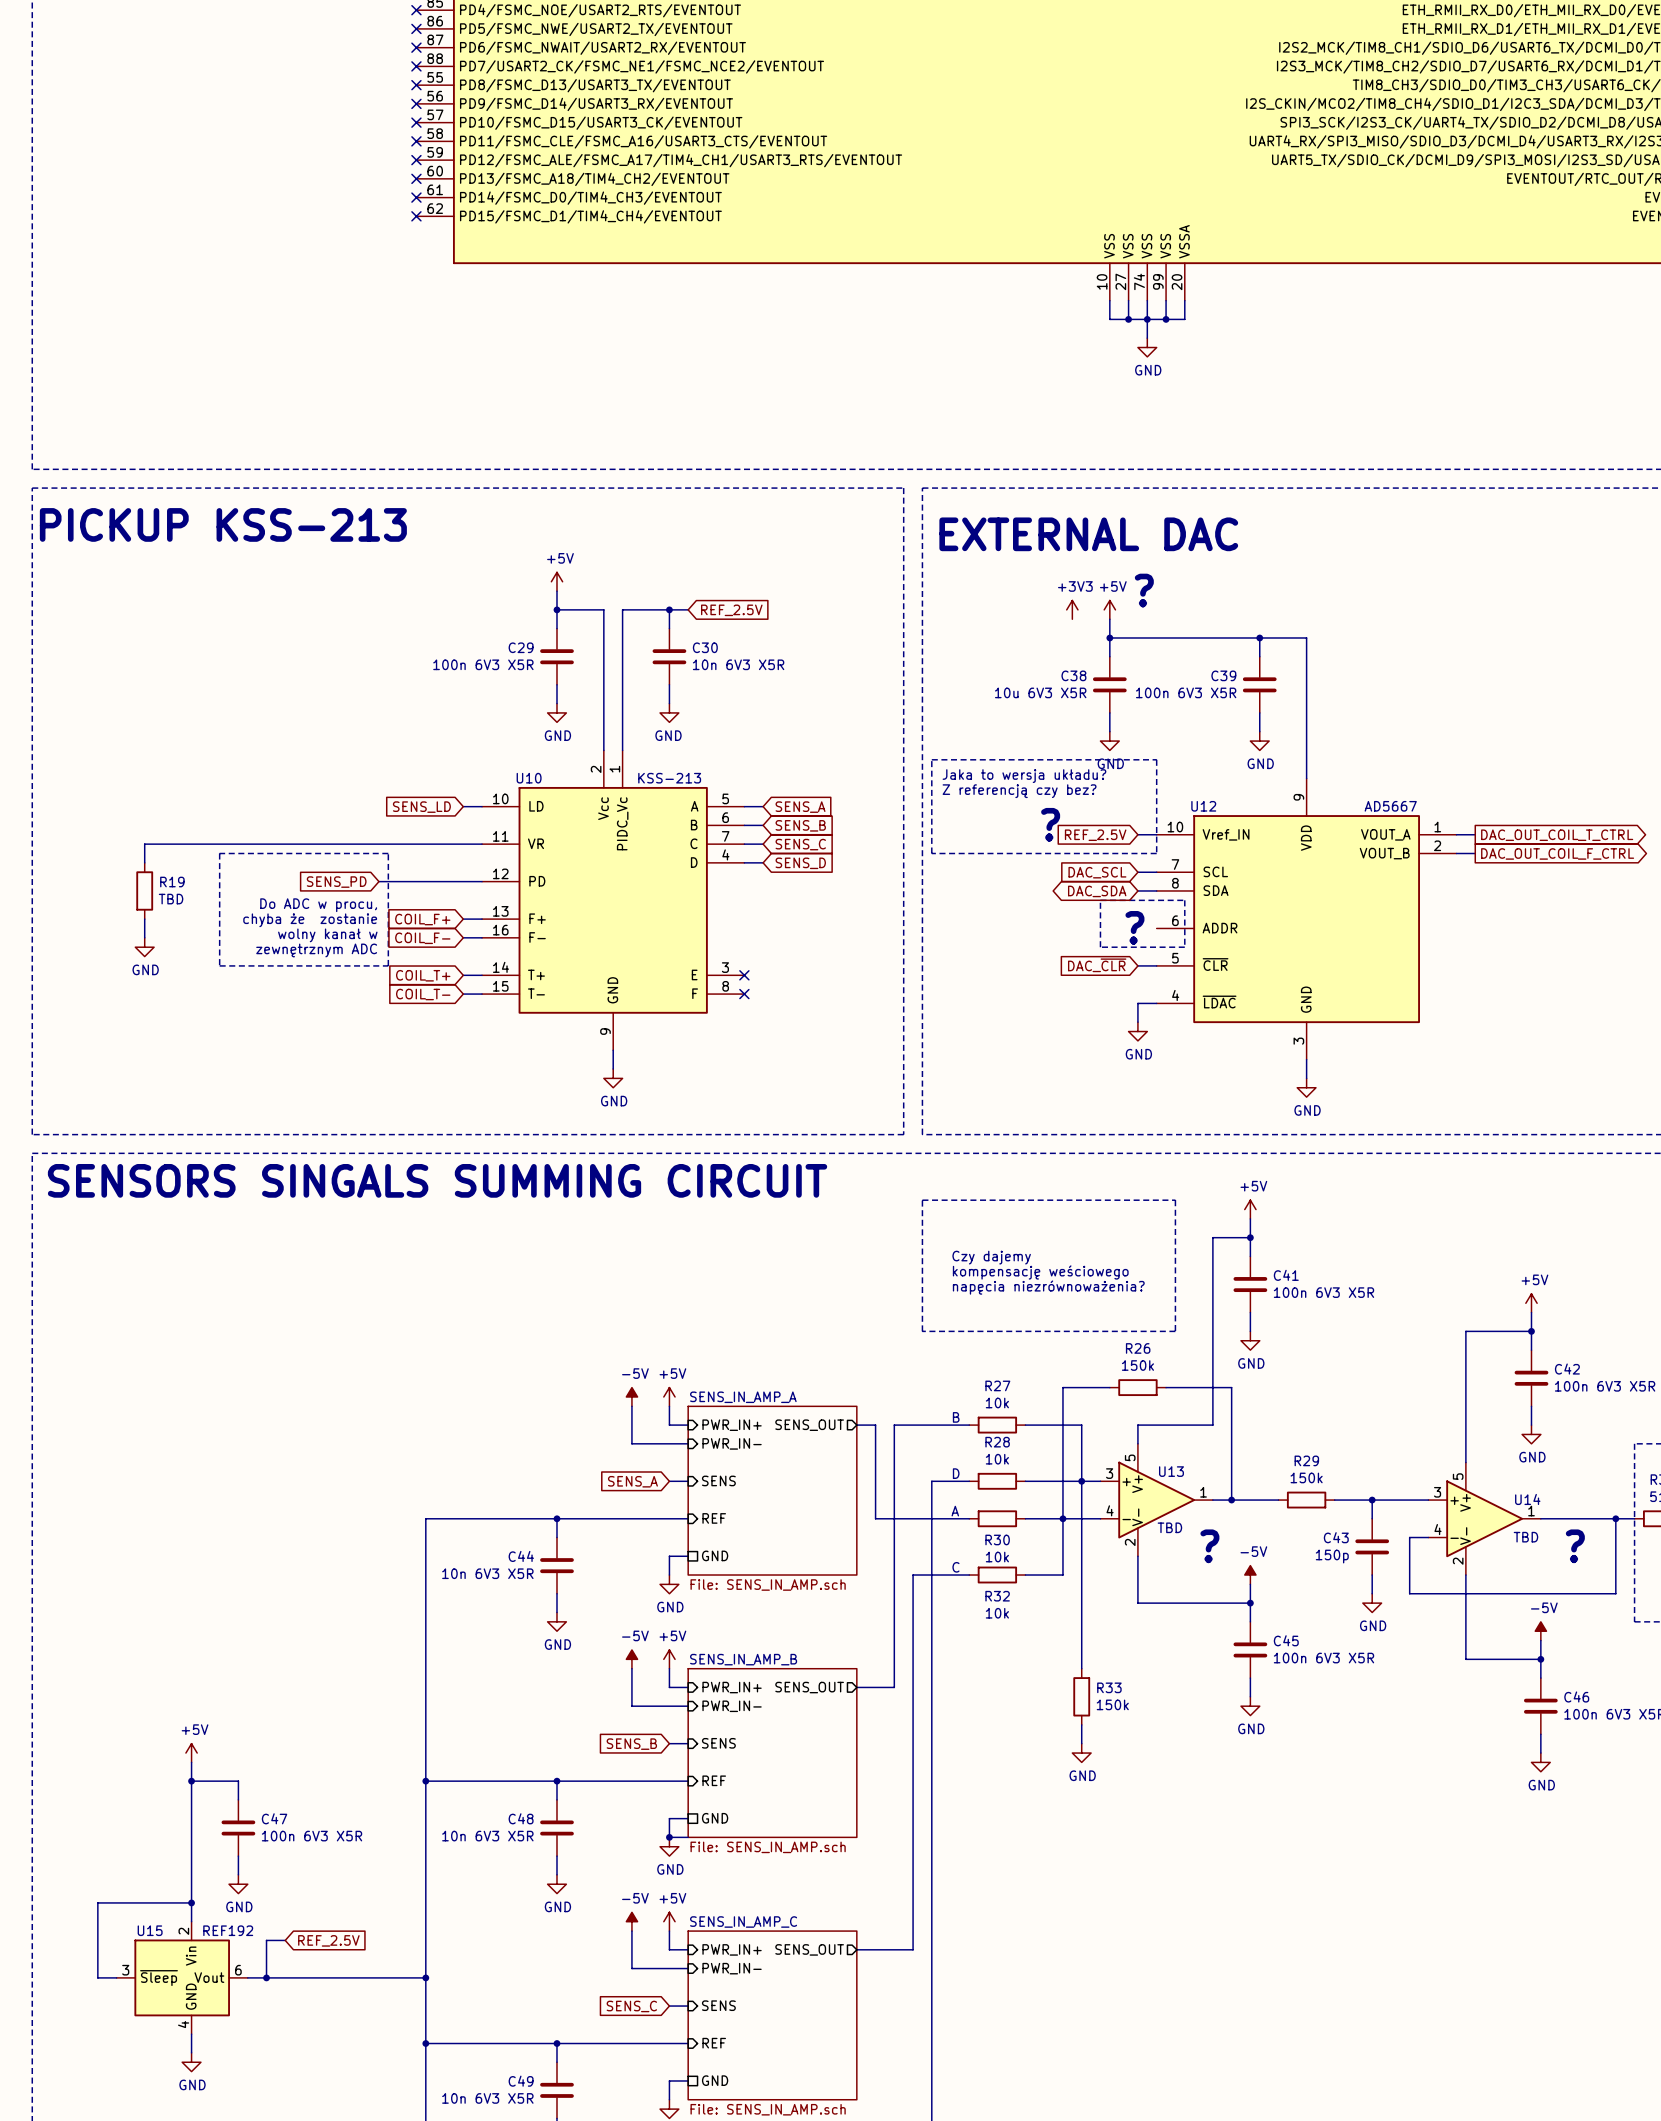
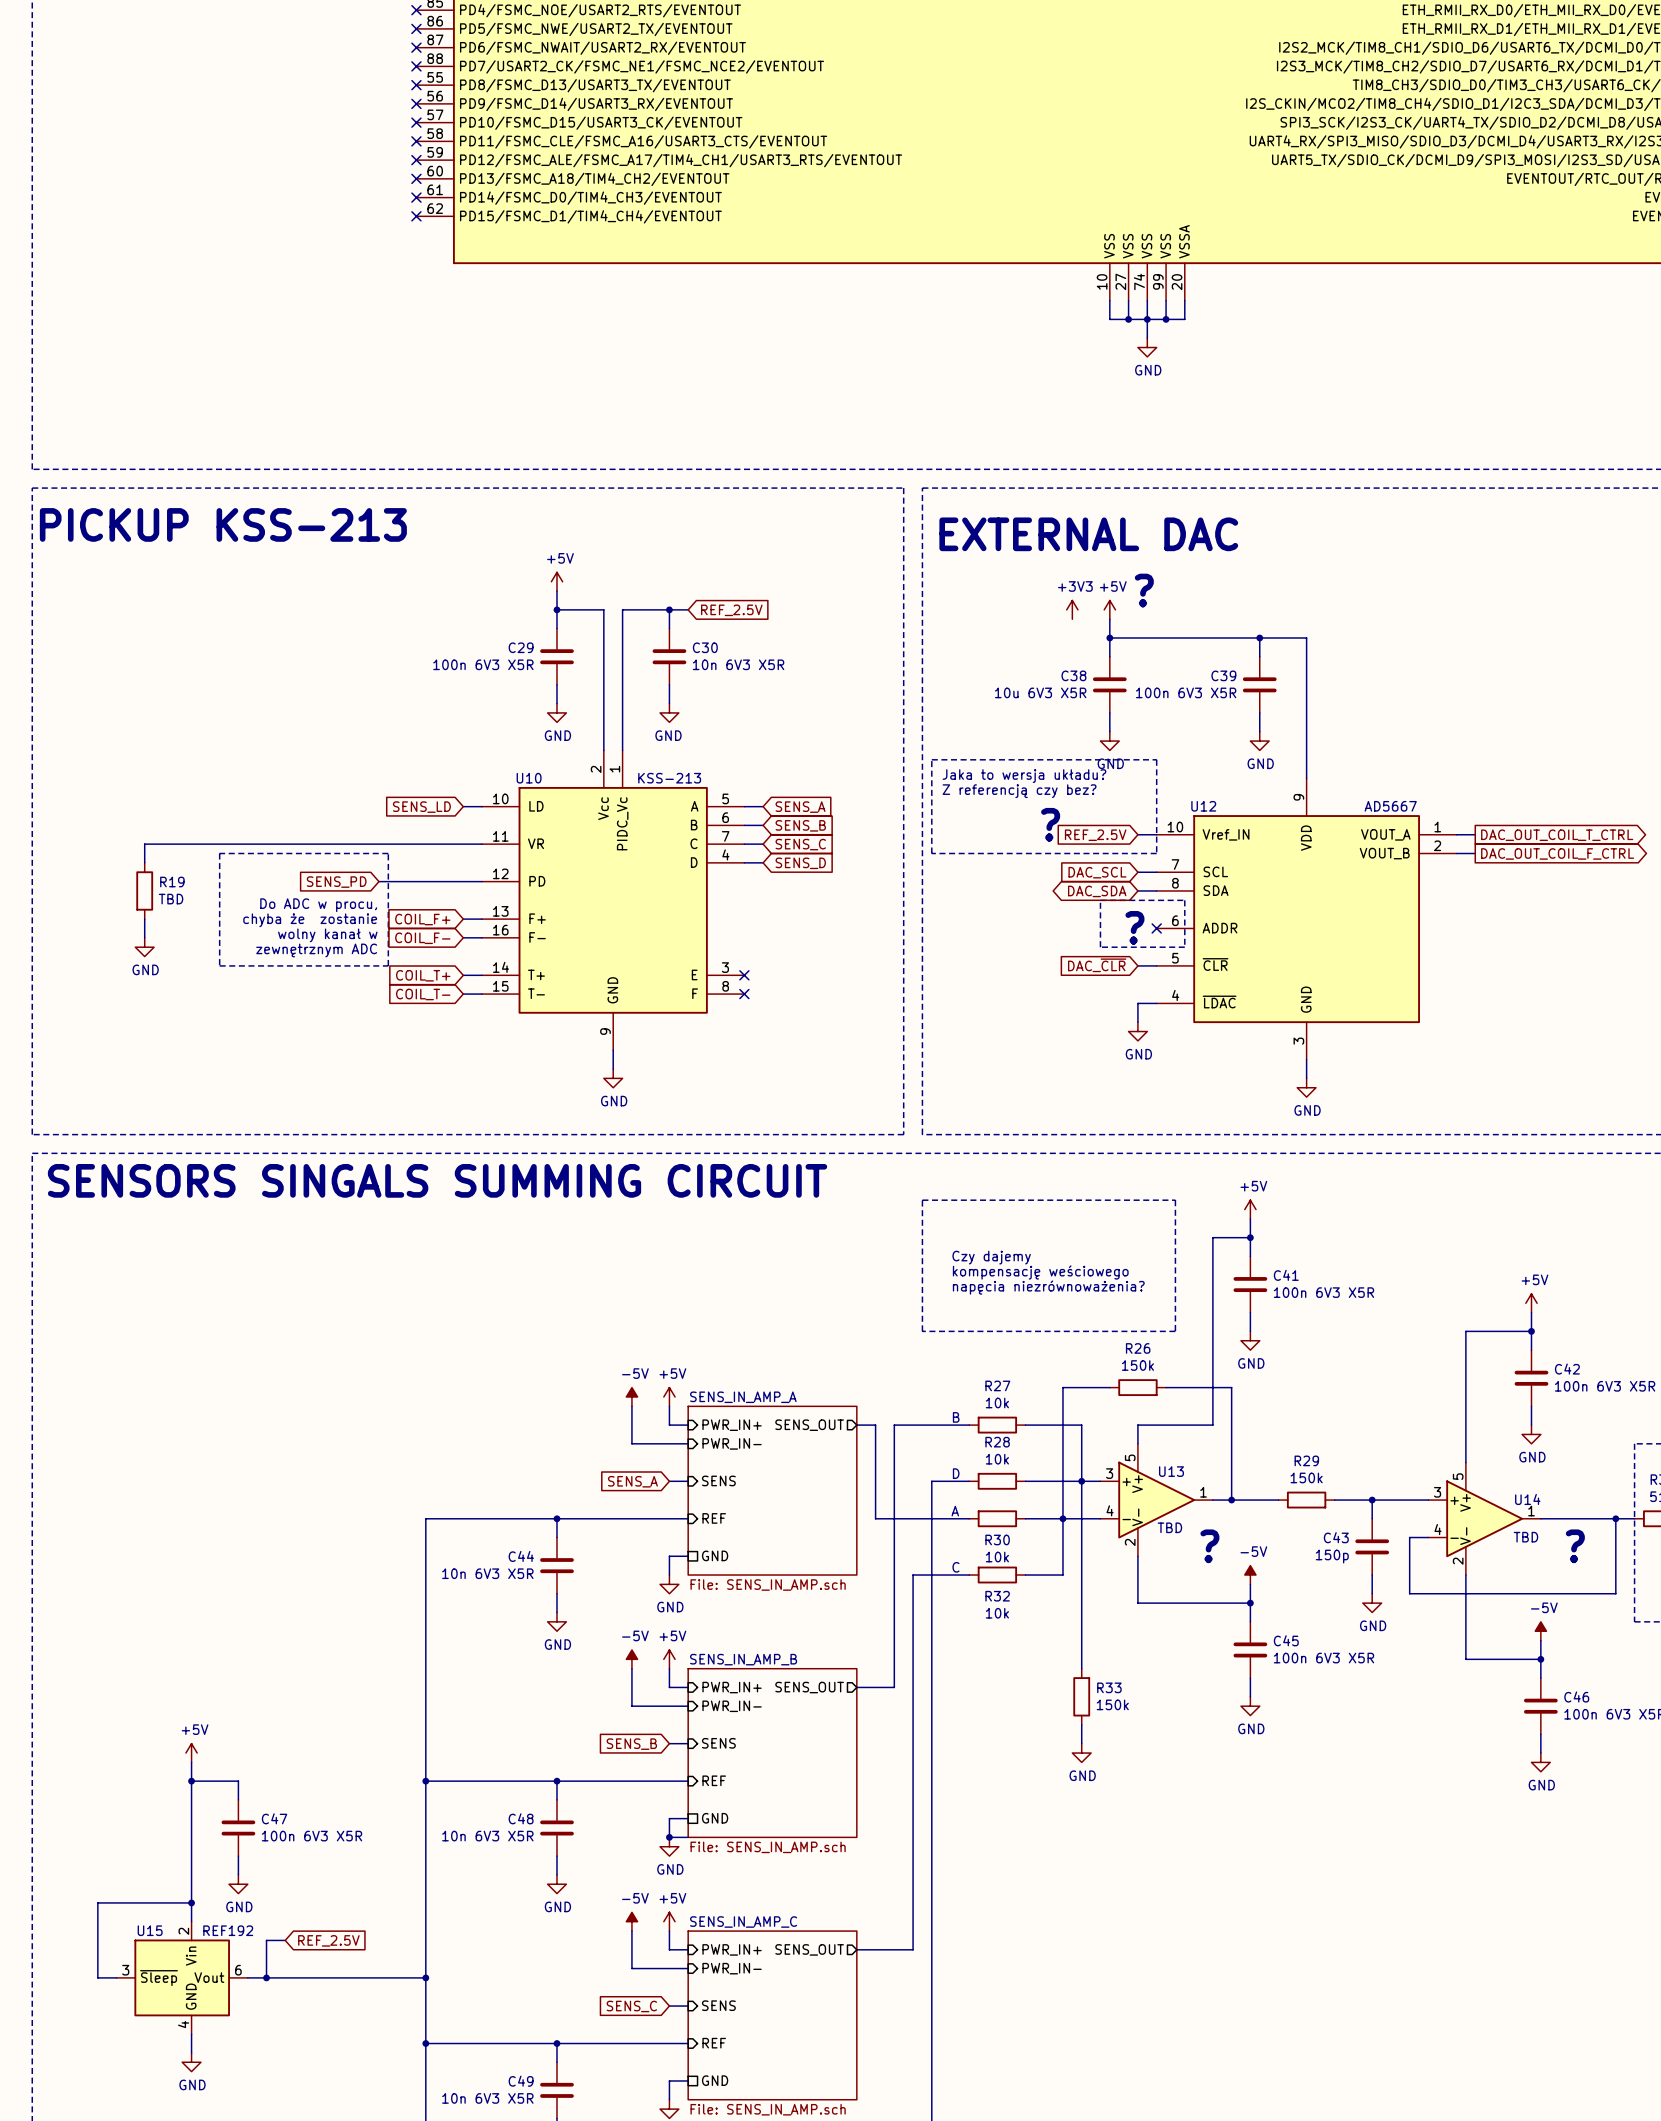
no-connect mark: none -> (1156, 928)

